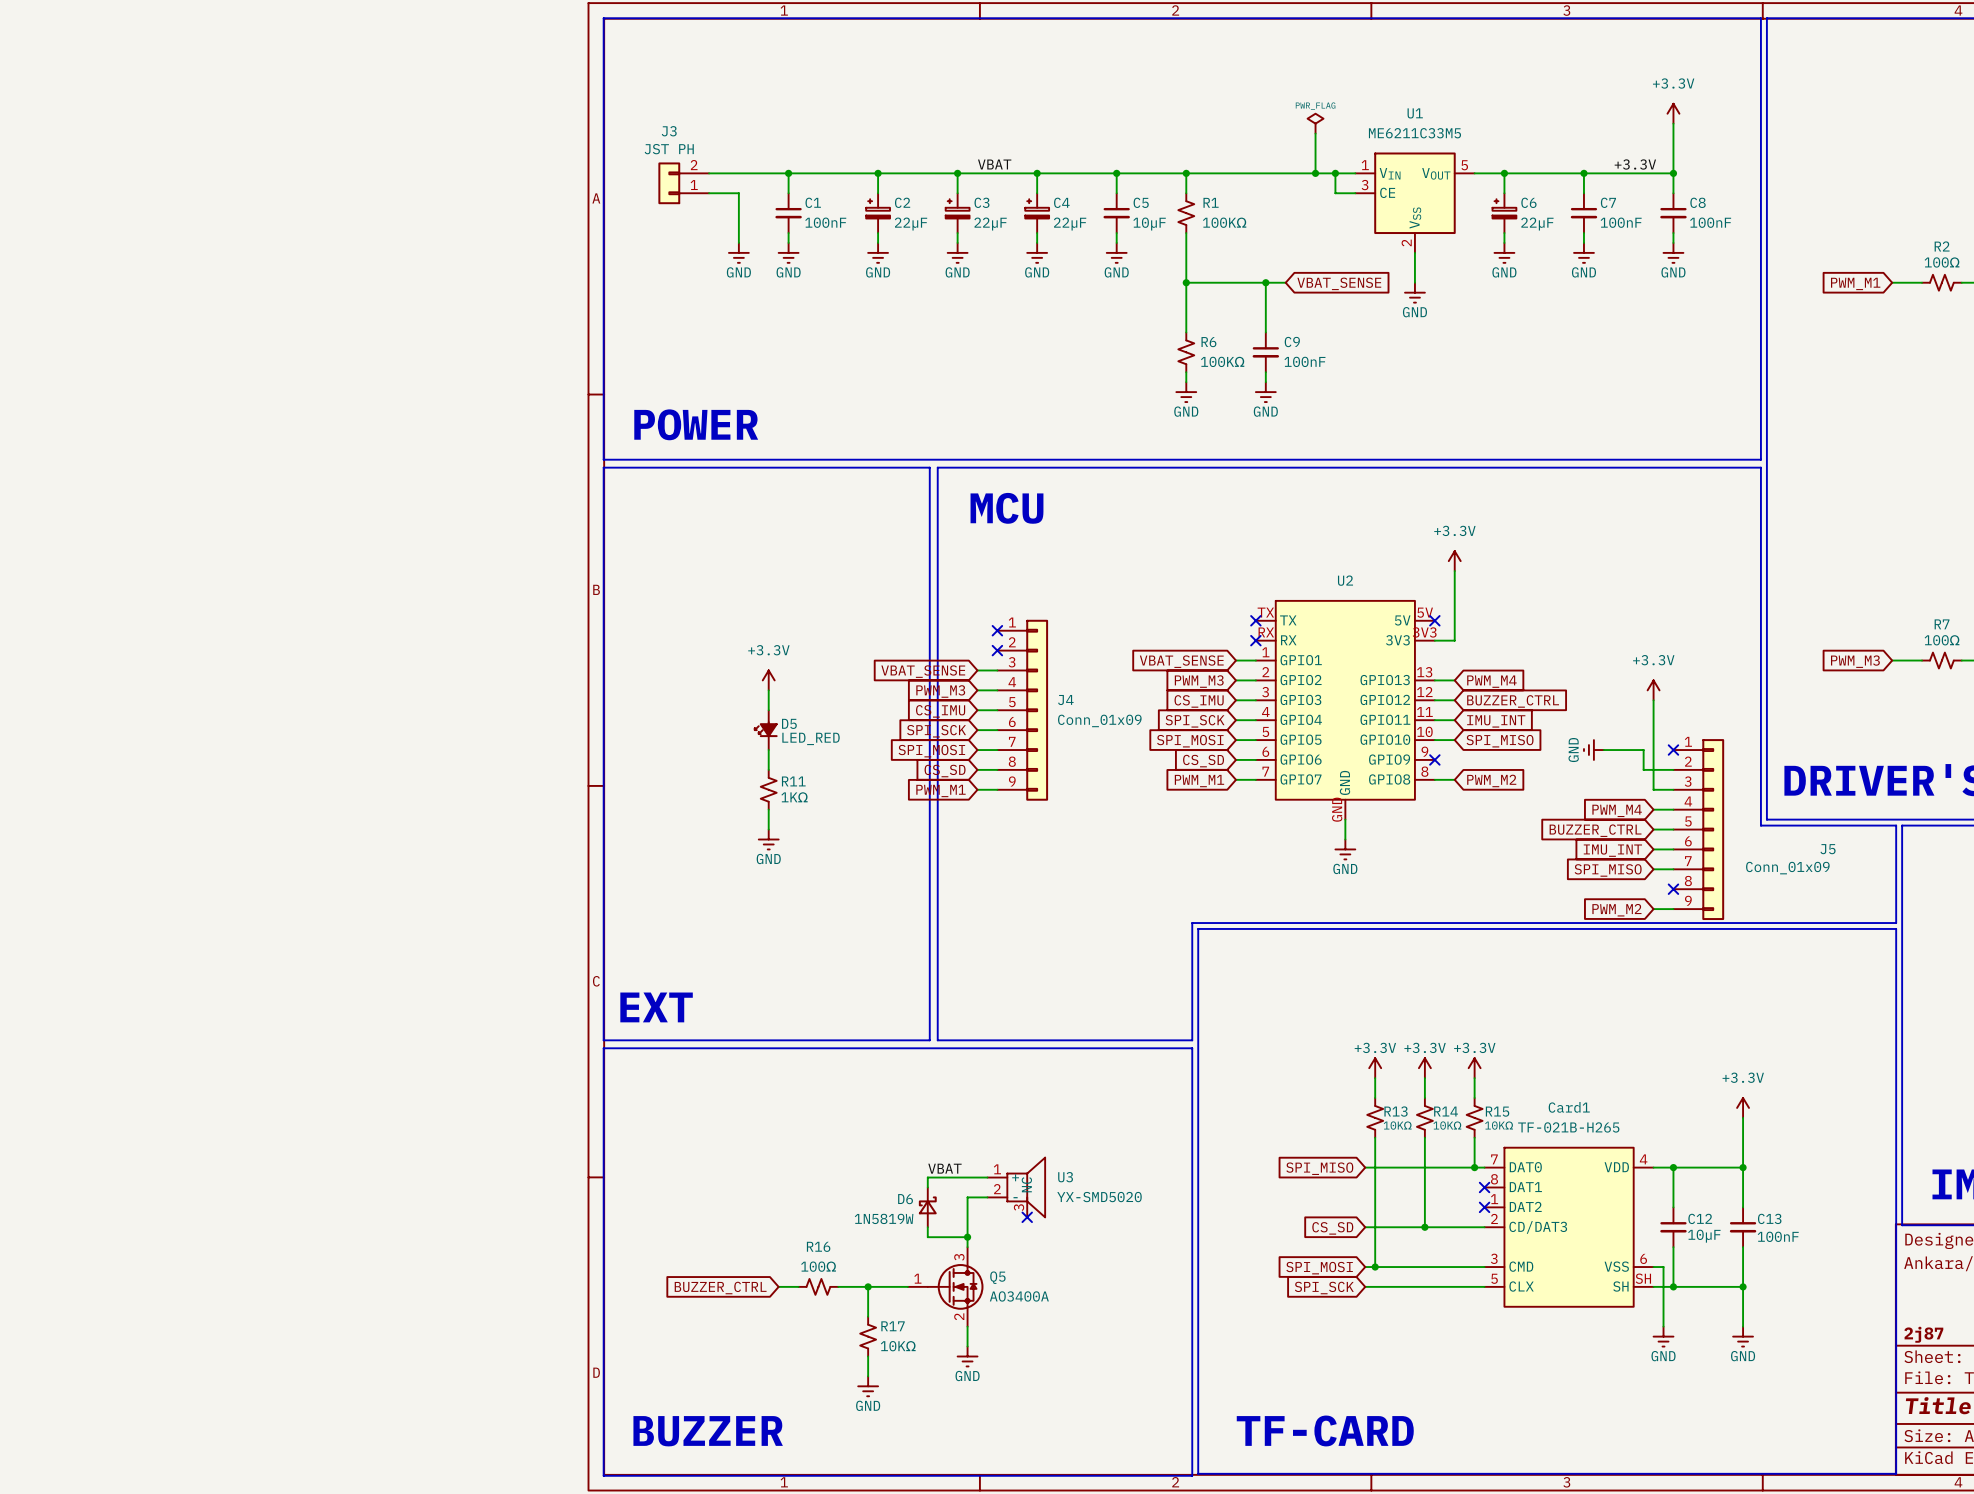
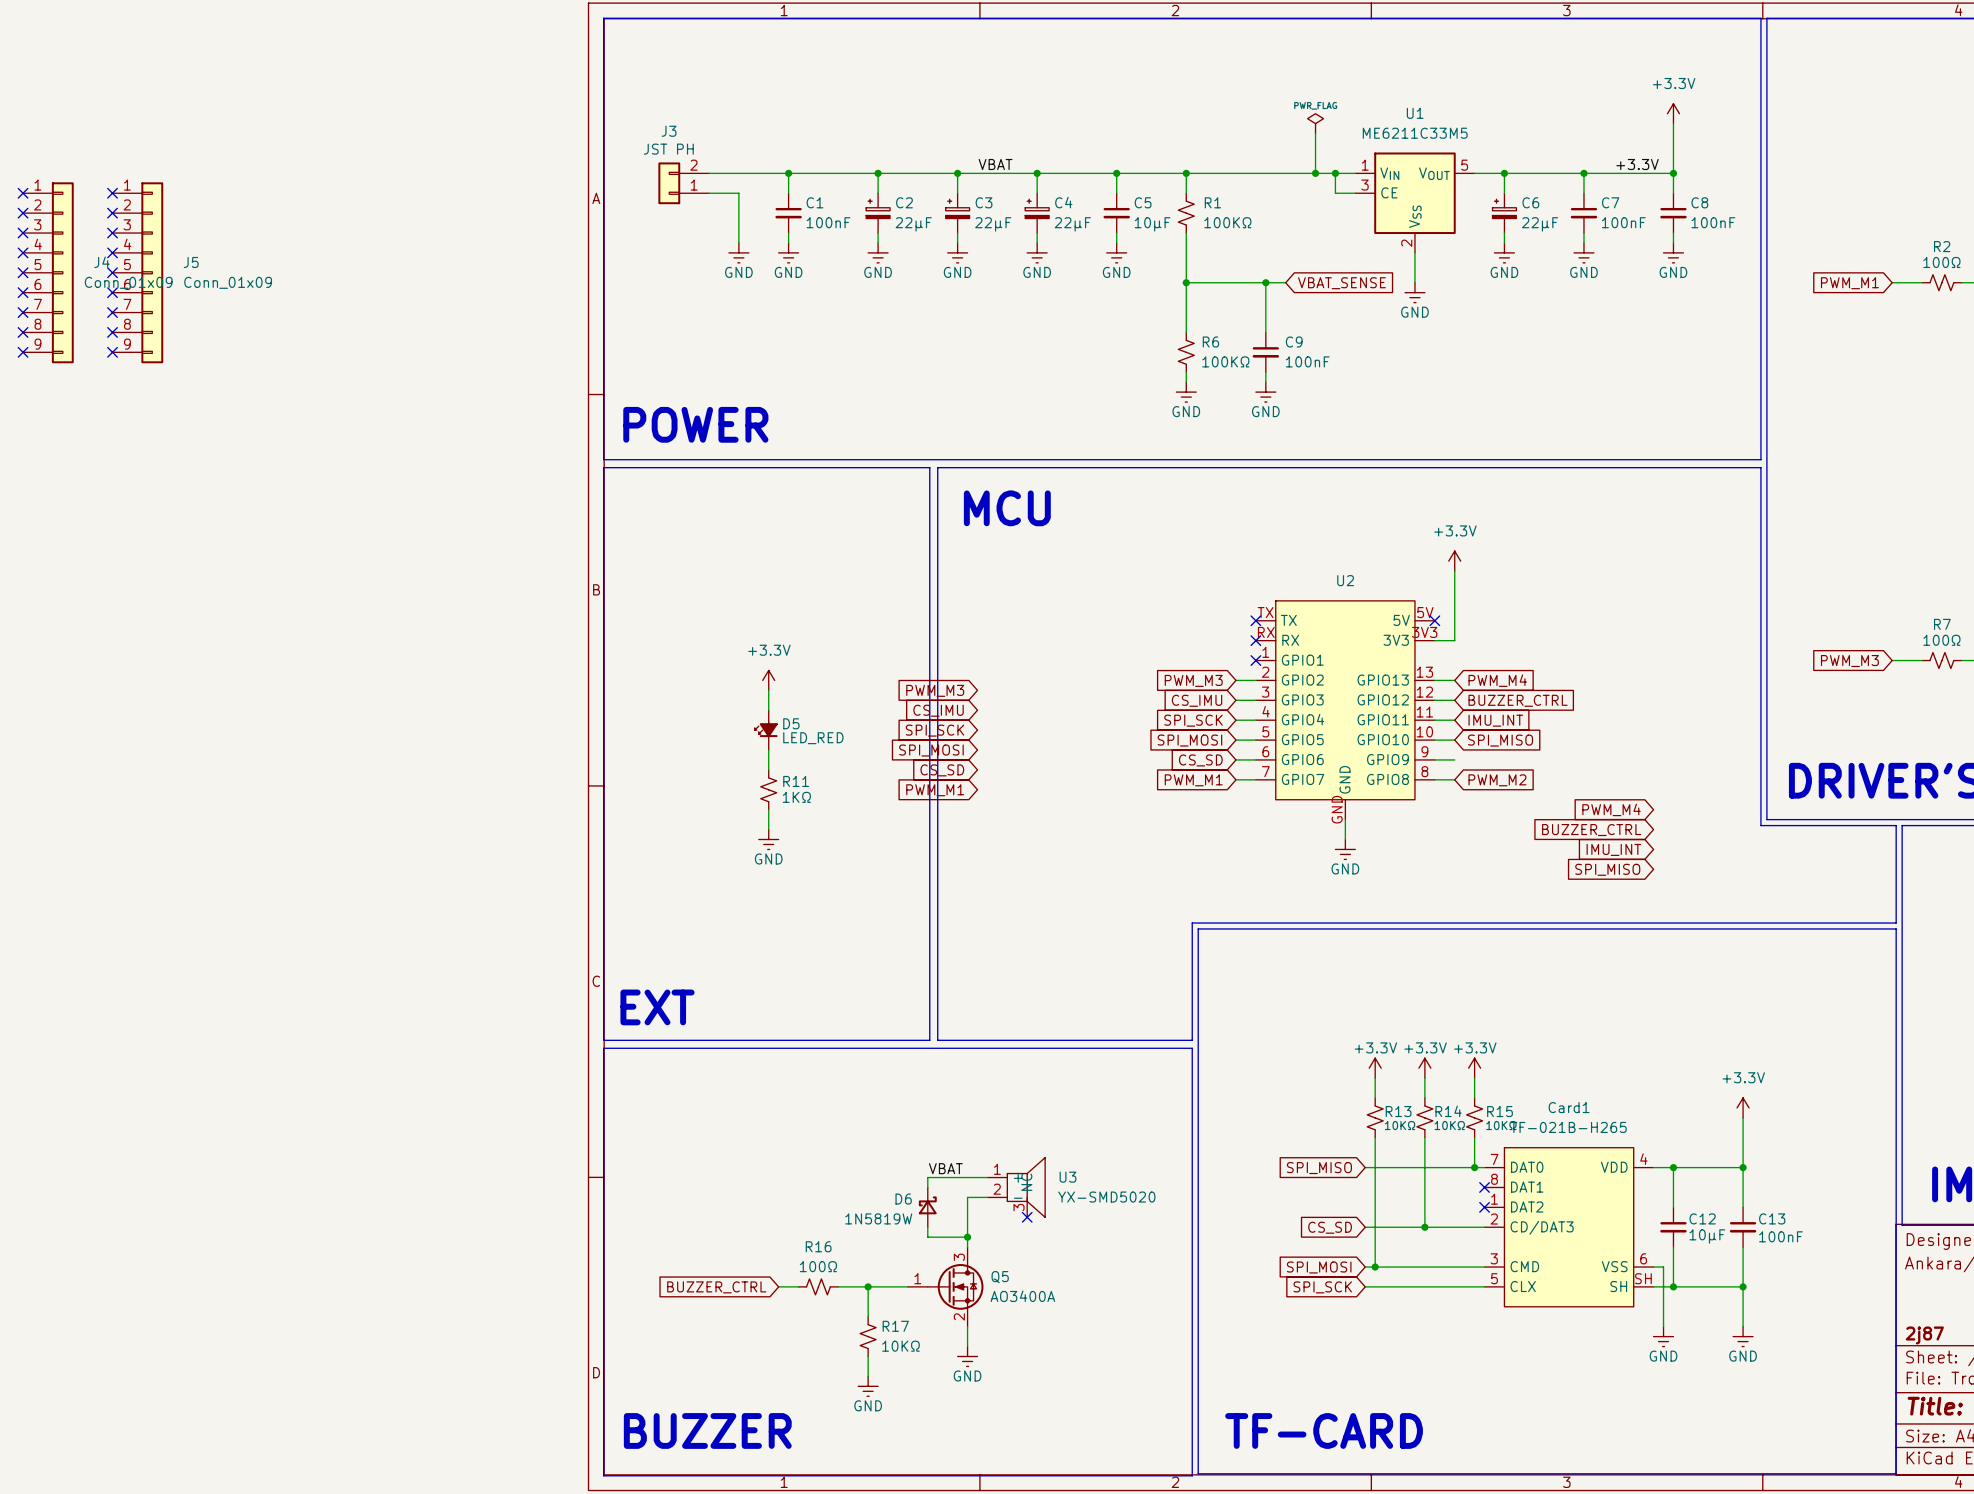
no-connect mark: none -> (23, 193)
no-connect mark: none -> (112, 193)
no-connect mark: none -> (23, 213)
no-connect mark: none -> (112, 213)
no-connect mark: none -> (23, 233)
no-connect mark: none -> (112, 233)
no-connect mark: none -> (23, 252)
no-connect mark: none -> (112, 252)
no-connect mark: none -> (23, 272)
no-connect mark: none -> (112, 272)
no-connect mark: none -> (23, 292)
no-connect mark: none -> (112, 292)
no-connect mark: none -> (23, 312)
no-connect mark: none -> (112, 312)
no-connect mark: none -> (23, 332)
no-connect mark: none -> (112, 332)
no-connect mark: none -> (23, 352)
no-connect mark: none -> (112, 352)
no-connect mark: (997, 630) -> none
no-connect mark: (997, 650) -> none
wire: (1236, 660) (1255, 660) -> none
no-connect mark: none -> (1255, 660)
global label: VBAT_SENSE (1181, 661) -> none
wire: (977, 670) (997, 670) -> none
global label: VBAT_SENSE (923, 671) -> none
wire: (977, 690) (997, 690) -> none
power symbol: +3.3V (1653, 690) -> none
J4 name position: J4 (1065, 700) -> J4 (101, 262)
wire: (1653, 700) (1653, 789) (1673, 789) -> none
wire: (977, 710) (997, 710) -> none
J4 position: (1022, 710) -> (48, 272)
wire: (977, 730) (997, 730) -> none
wire: (977, 750) (997, 750) -> none
power symbol: GND (1593, 750) -> none
wire: (1603, 750) (1643, 750) (1643, 769) (1673, 769) -> none
no-connect mark: (1673, 750) -> none
wire: none -> (1434, 759) (1454, 759)
no-connect mark: (1434, 759) -> none
wire: (977, 769) (997, 769) -> none
wire: (977, 789) (997, 789) -> none
wire: (1653, 809) (1673, 809) -> none
wire: (1653, 829) (1673, 829) -> none
J5 position: (1698, 829) -> (137, 272)
wire: (1653, 849) (1673, 849) -> none
J5 name position: J5 (1828, 849) -> J5 (191, 262)
J5 value position: Conn_01x09 (1787, 868) -> Conn_01x09 (228, 282)
wire: (1653, 869) (1673, 869) -> none
no-connect mark: (1673, 889) -> none
wire: (1653, 909) (1673, 909) -> none
global label: PWM_M2 (1616, 910) -> none

